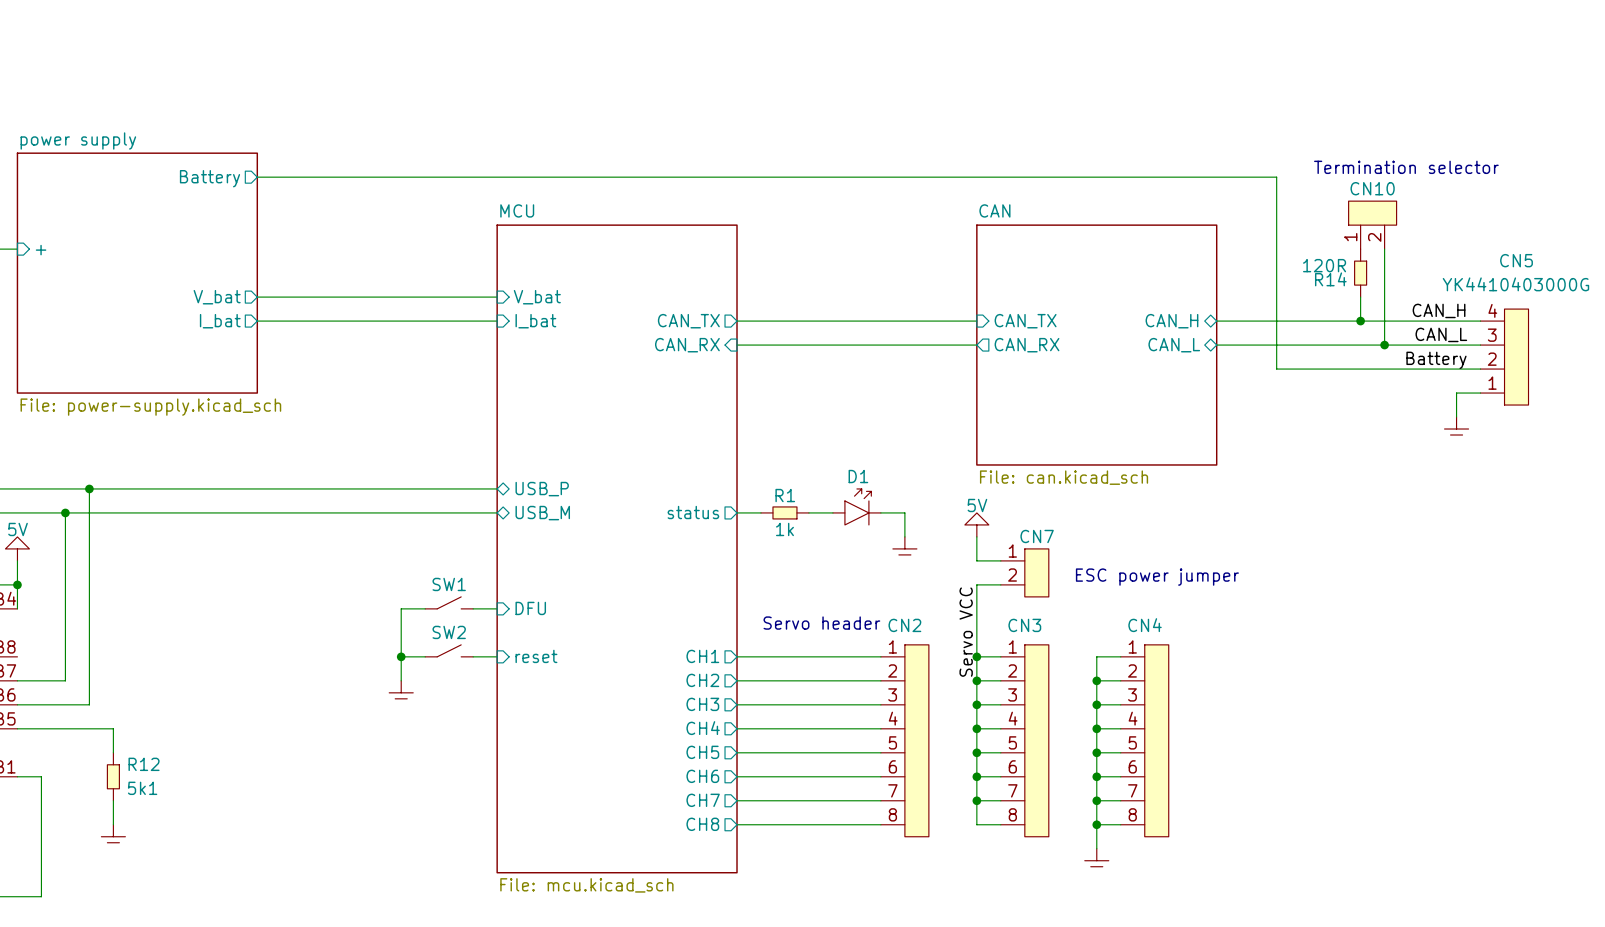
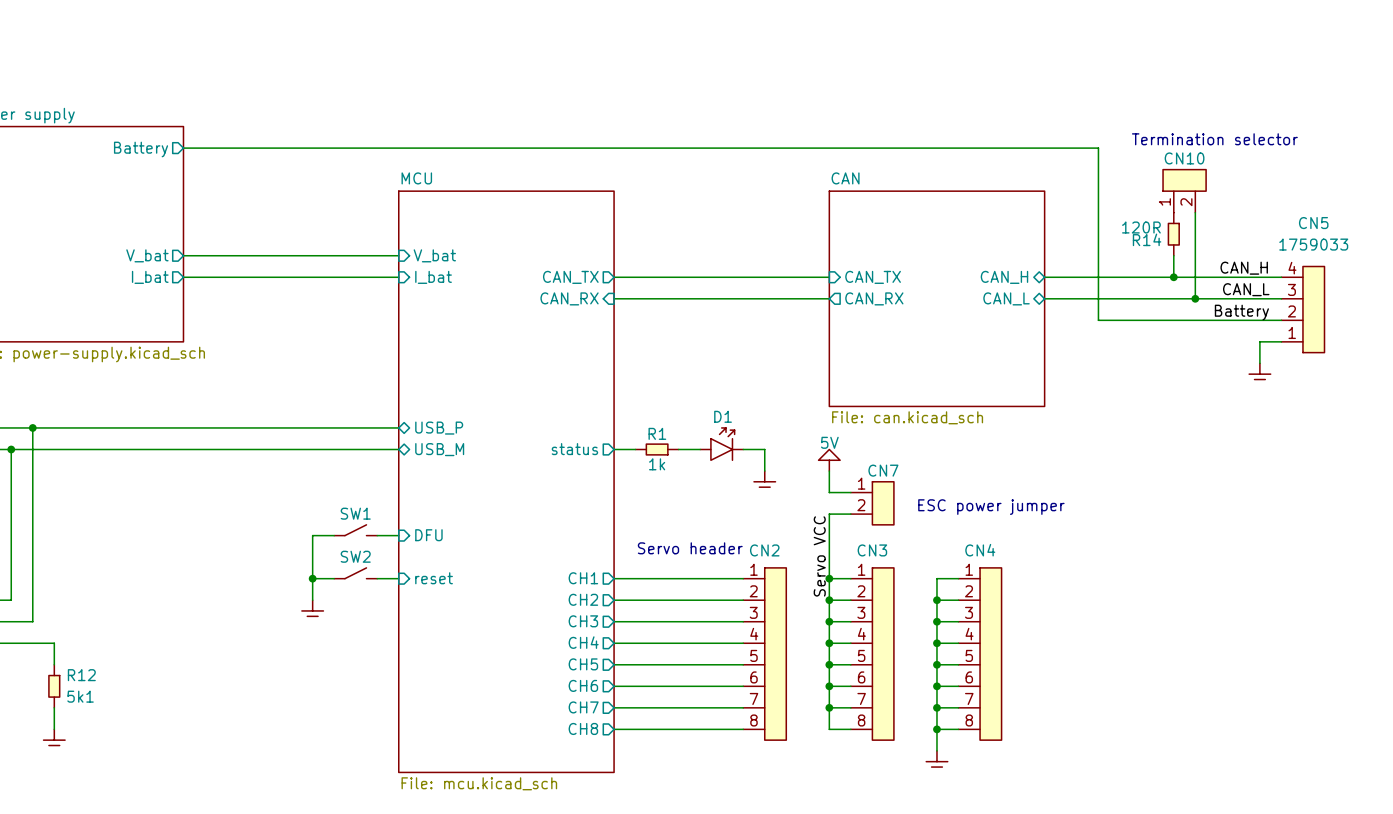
CN5 text: YK4410403000G (1515, 284) -> 1759033 (1313, 244)

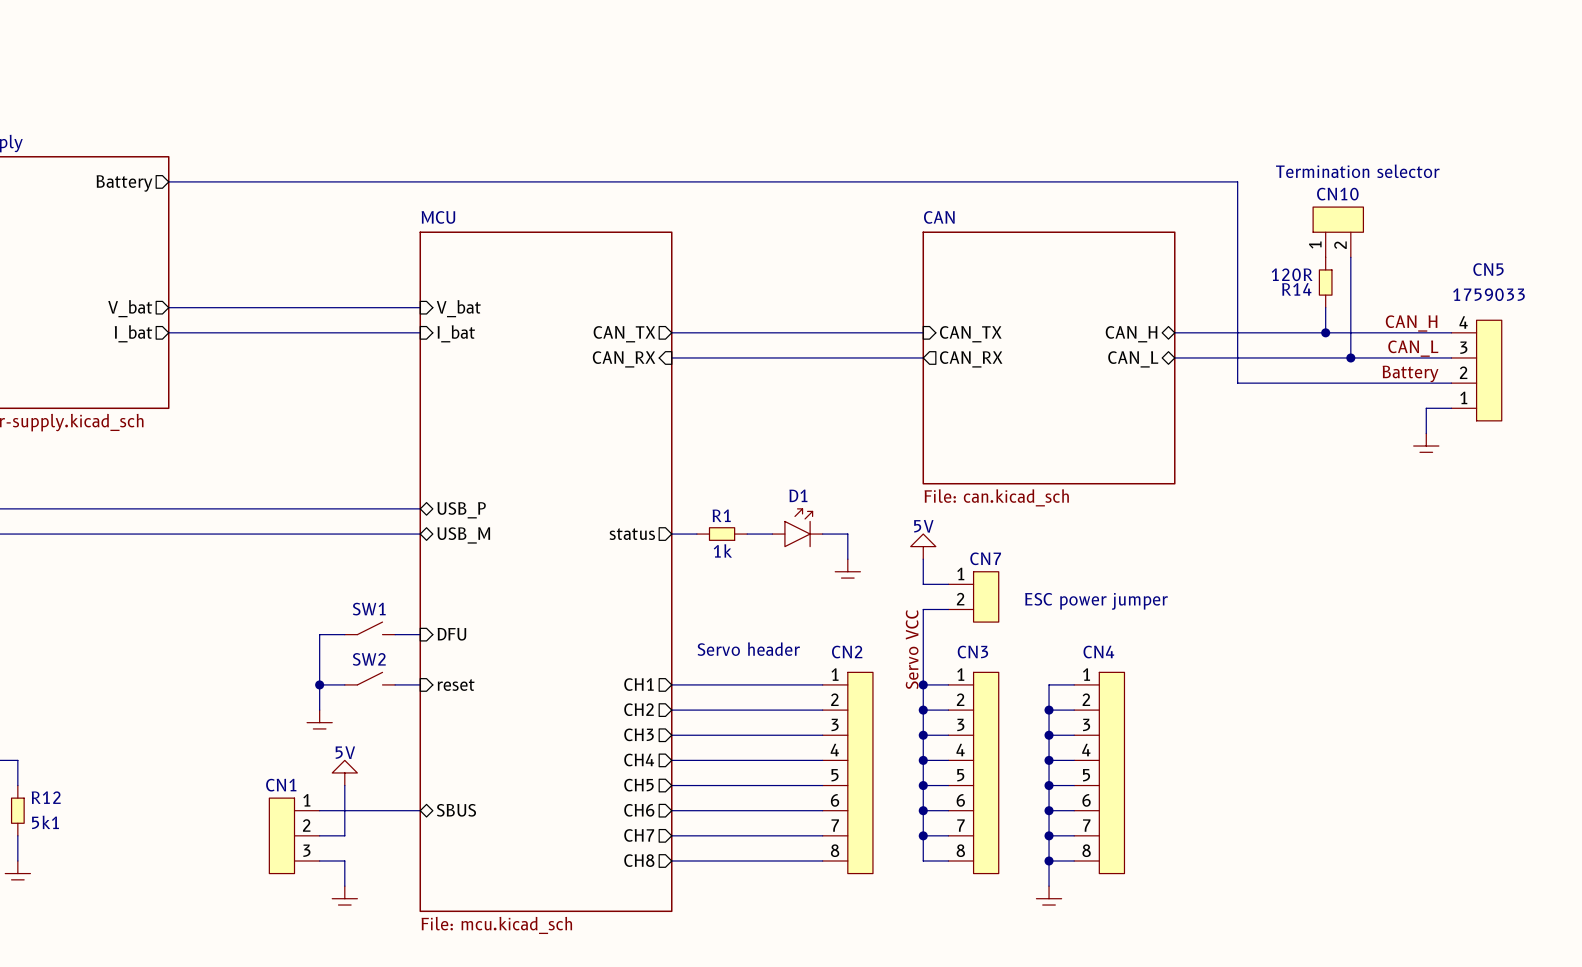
power symbol: none -> 5V (344, 772)
wire: none -> (344, 785) (344, 835) (319, 835)
sheet pin: none -> SBUS (456, 810)
wire: none -> (319, 810) (420, 810)
CN1: none -> (294, 835)
wire: none -> (319, 860) (344, 860) (344, 886)
power symbol: none -> (344, 898)

